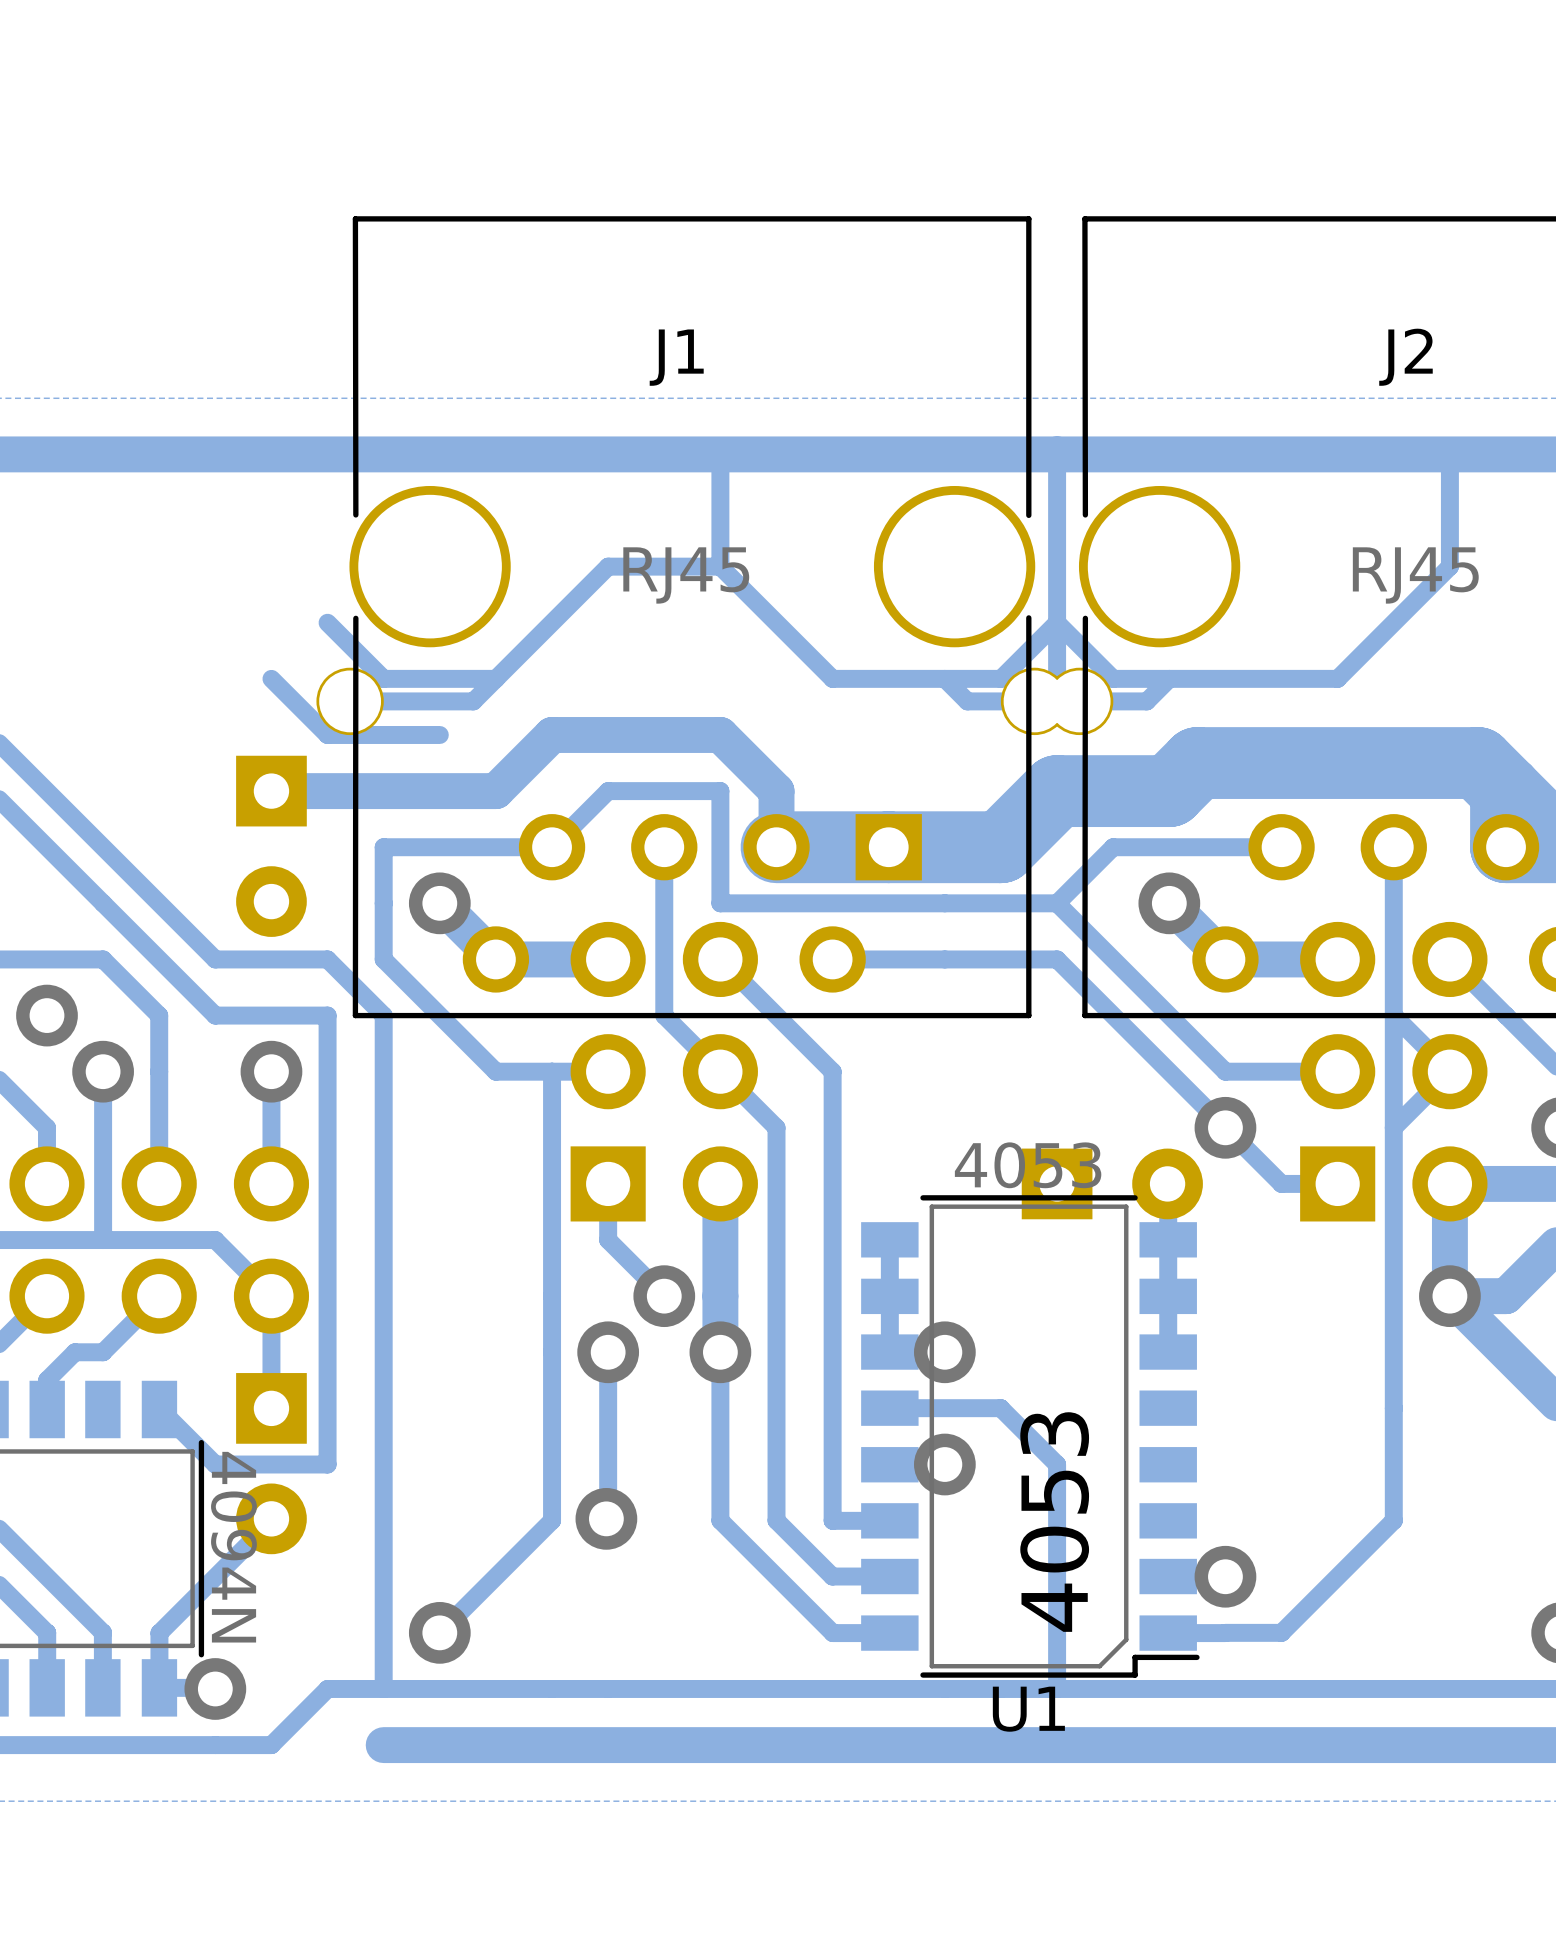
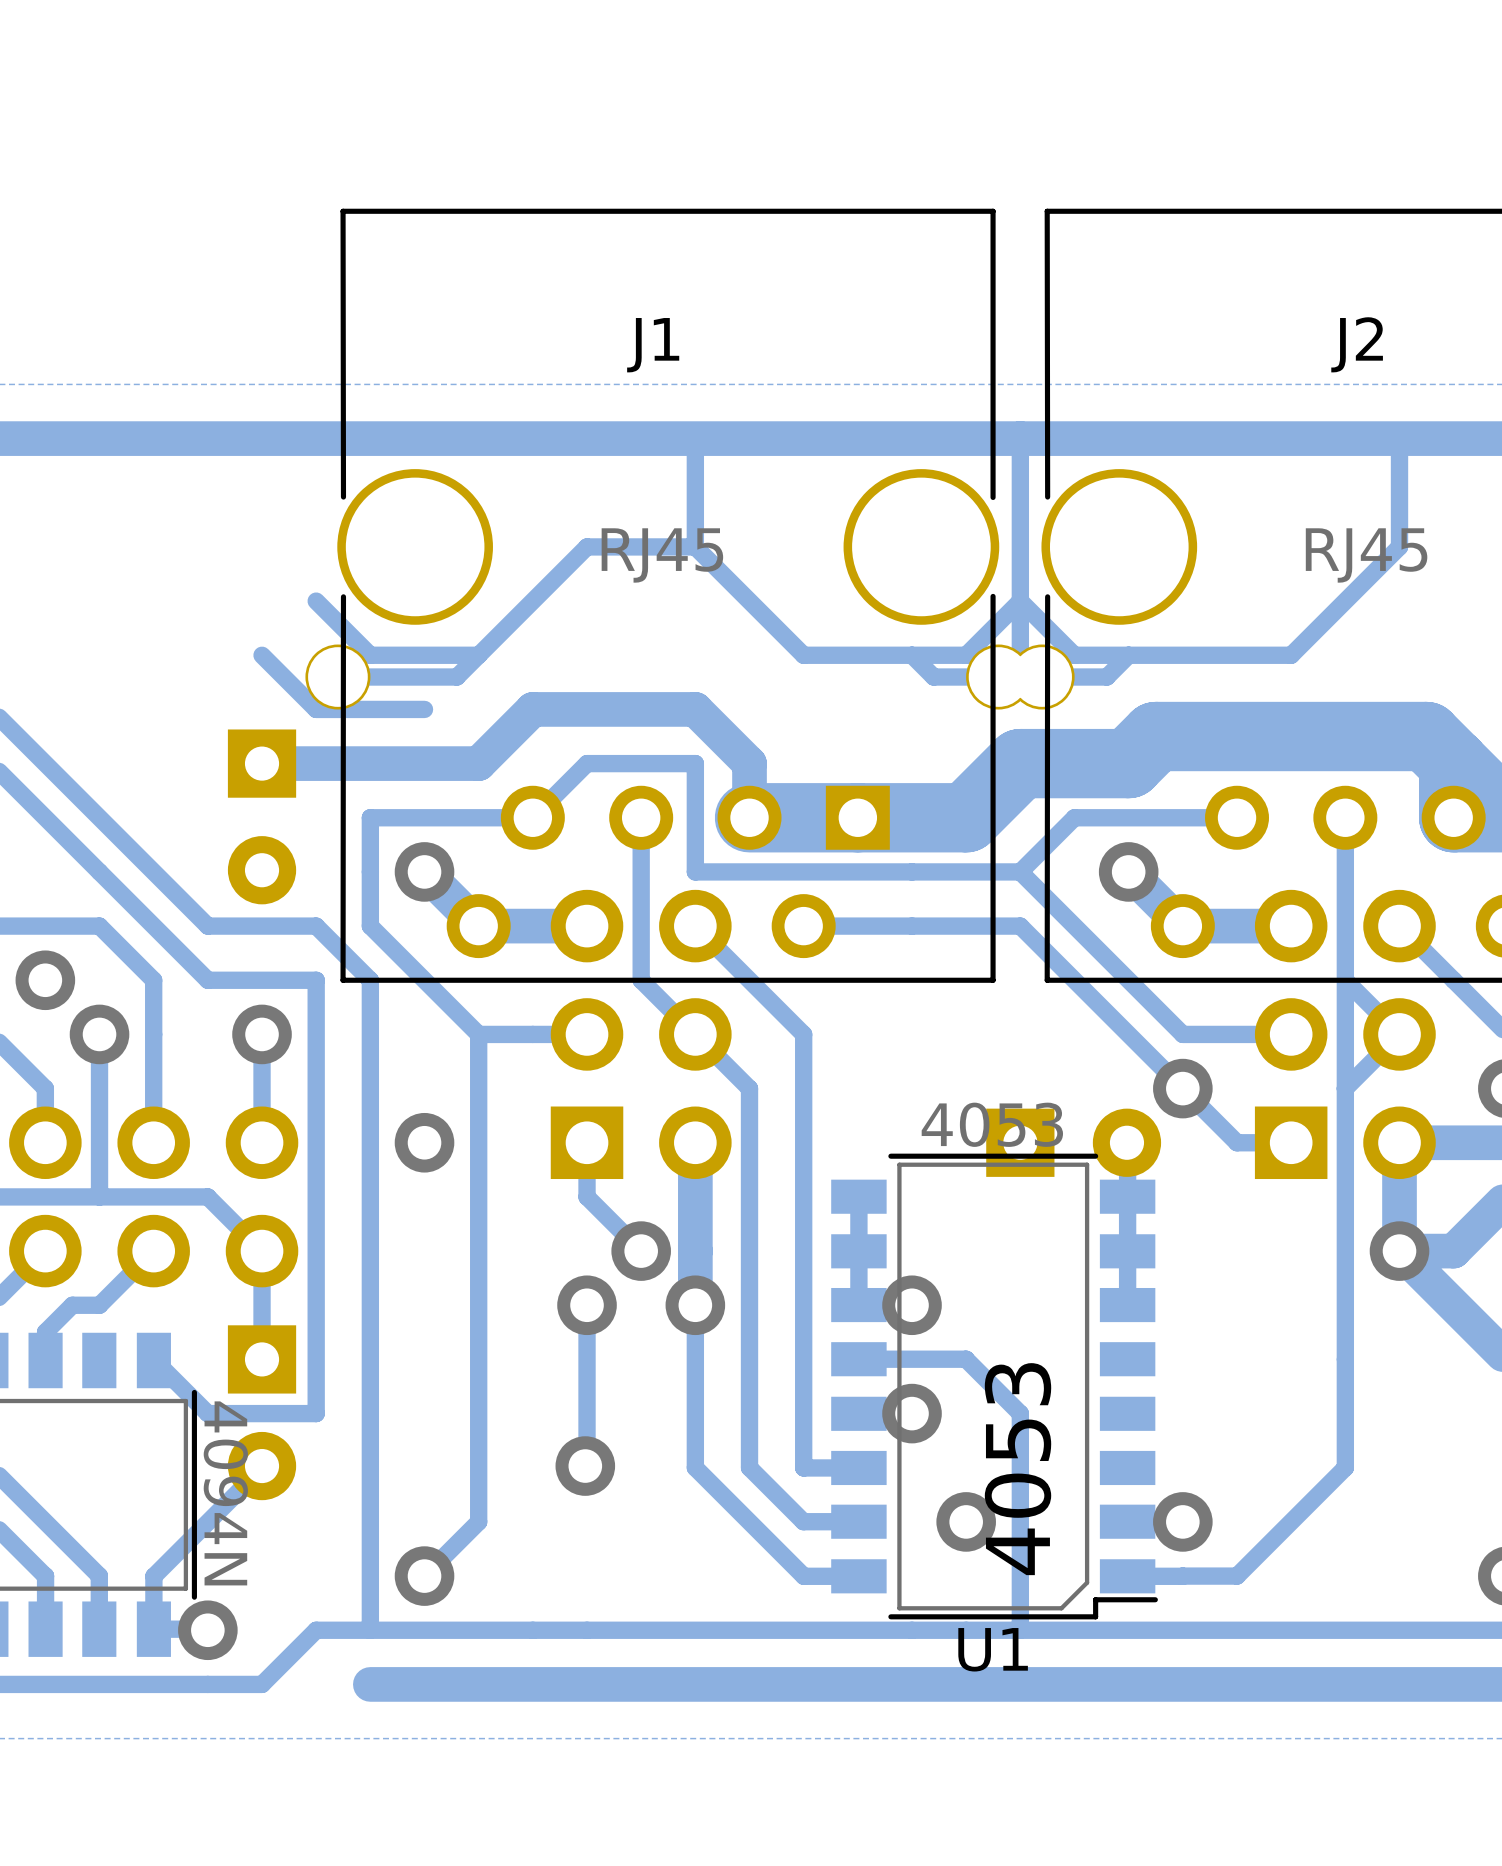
track: (552, 1071) (552, 1520) (495, 1576) -> (478, 1034) (478, 1521)
via: none -> (424, 1142)
via: none -> (966, 1521)

